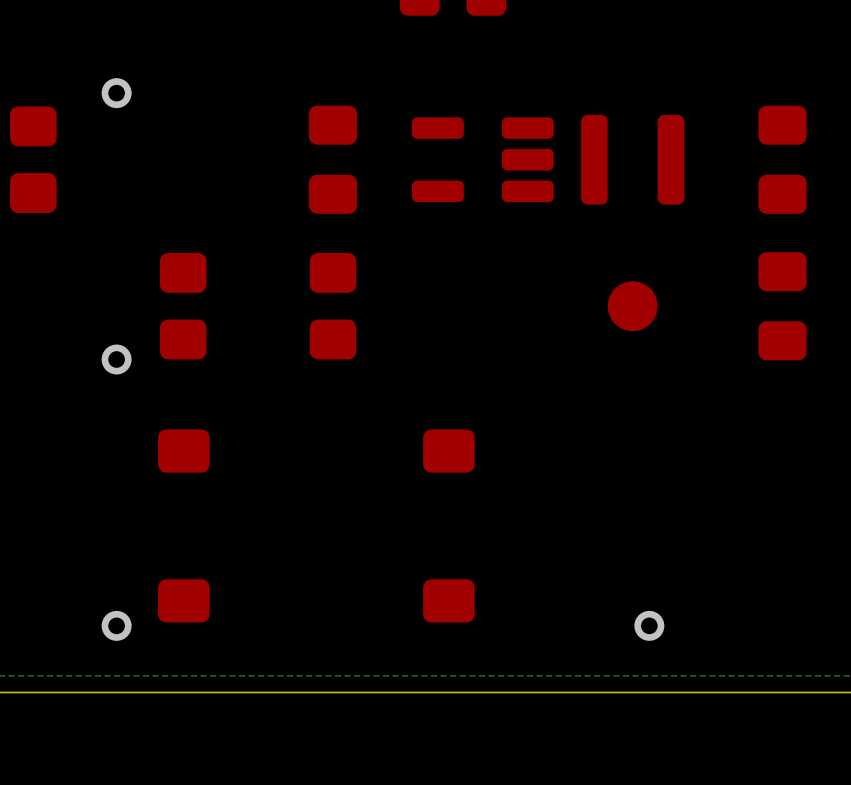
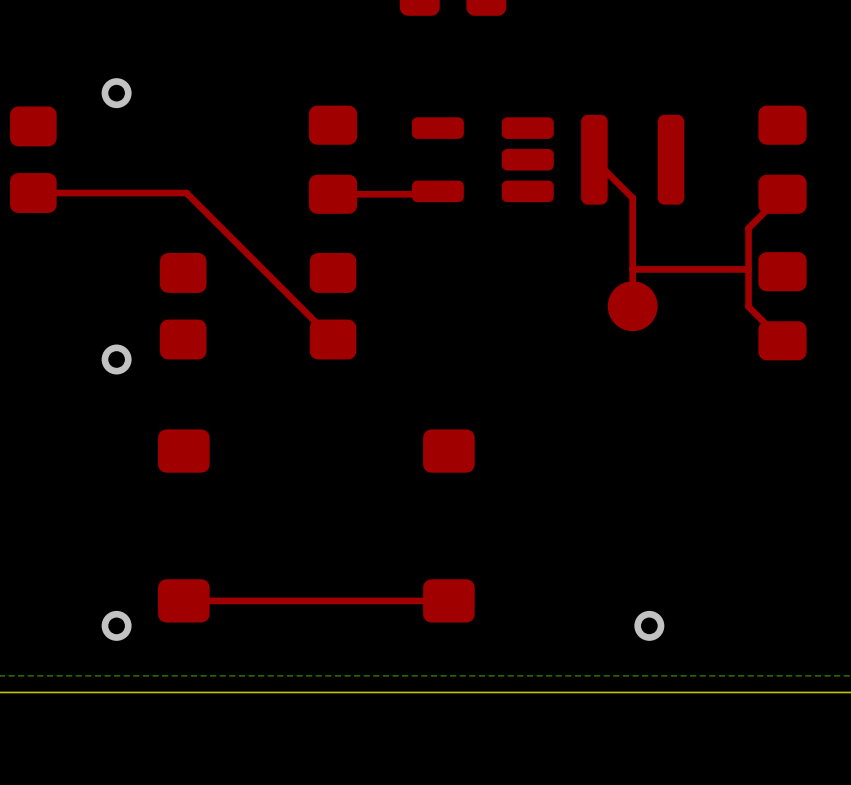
top track: none -> (594, 159) (632, 198) (632, 306)
top track: none -> (437, 191) (435, 194) (333, 194)
top track: none -> (33, 193) (186, 193) (333, 339)
top track: none -> (782, 194) (748, 228) (748, 306) (782, 340)
top track: none -> (748, 269) (632, 269)
top track: none -> (448, 600) (183, 600)

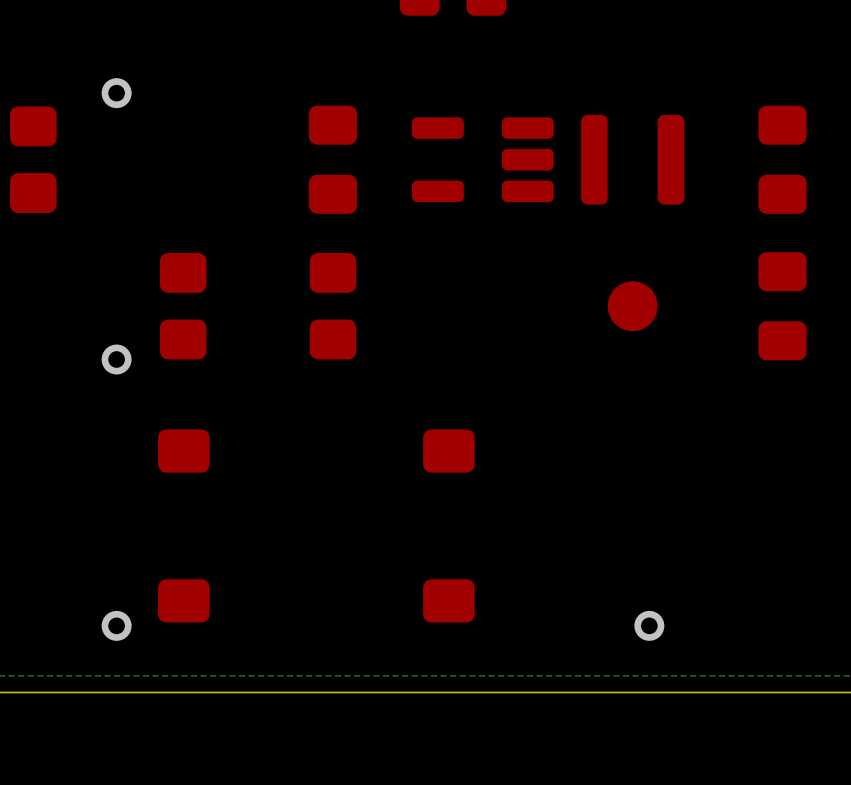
top track: (594, 159) (632, 198) (632, 306) -> none
top track: (437, 191) (435, 194) (333, 194) -> none
top track: (33, 193) (186, 193) (333, 339) -> none
top track: (782, 194) (748, 228) (748, 306) (782, 340) -> none
top track: (748, 269) (632, 269) -> none
top track: (448, 600) (183, 600) -> none

